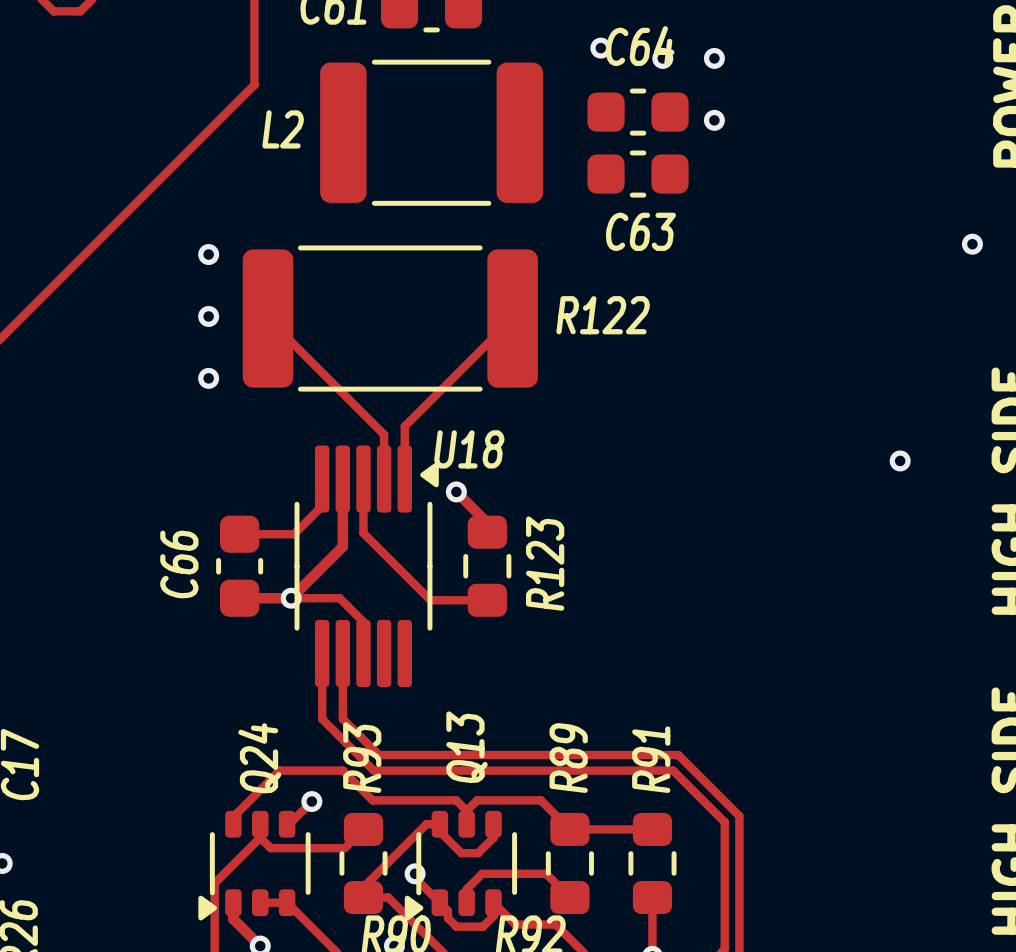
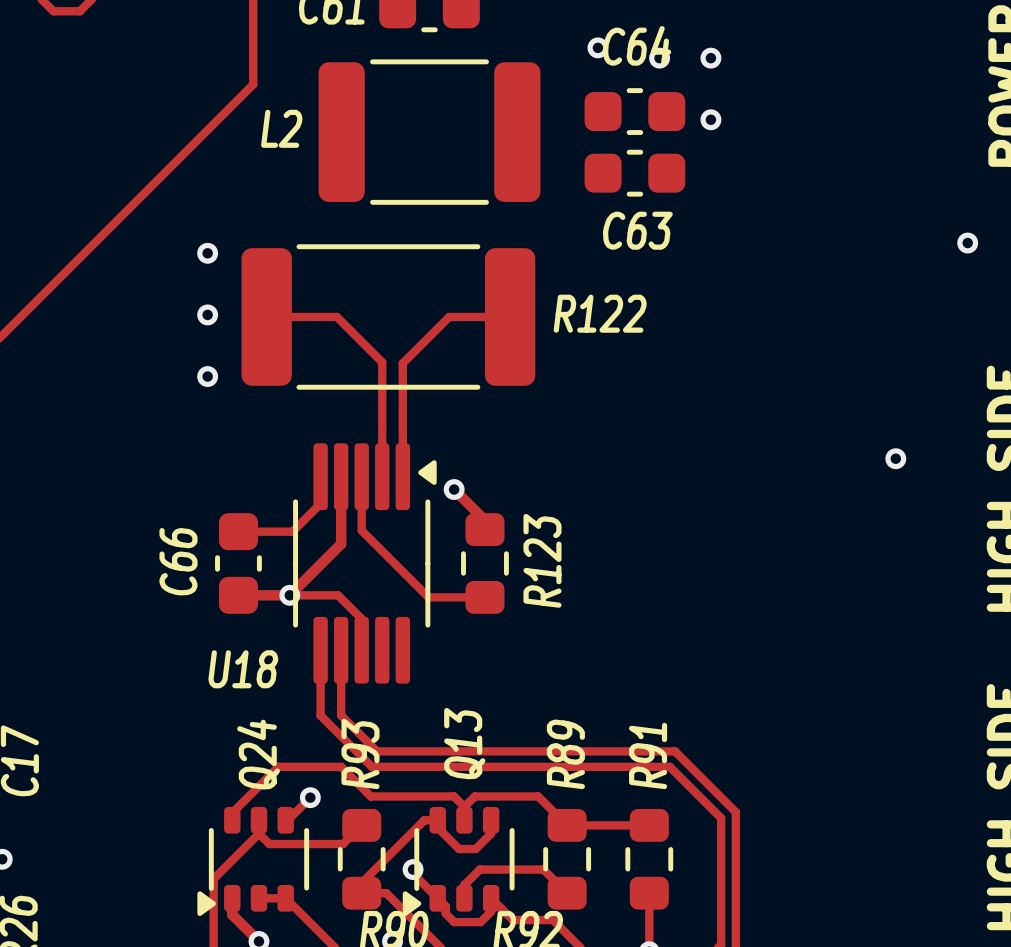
track: (268, 318) (384, 434) -> (266, 316) (336, 316) (382, 362) (382, 432)
track: (512, 318) (404, 426) -> (510, 316) (449, 316) (402, 363) (402, 424)
U18 name position: U18 (469, 449) -> U18 (243, 669)

